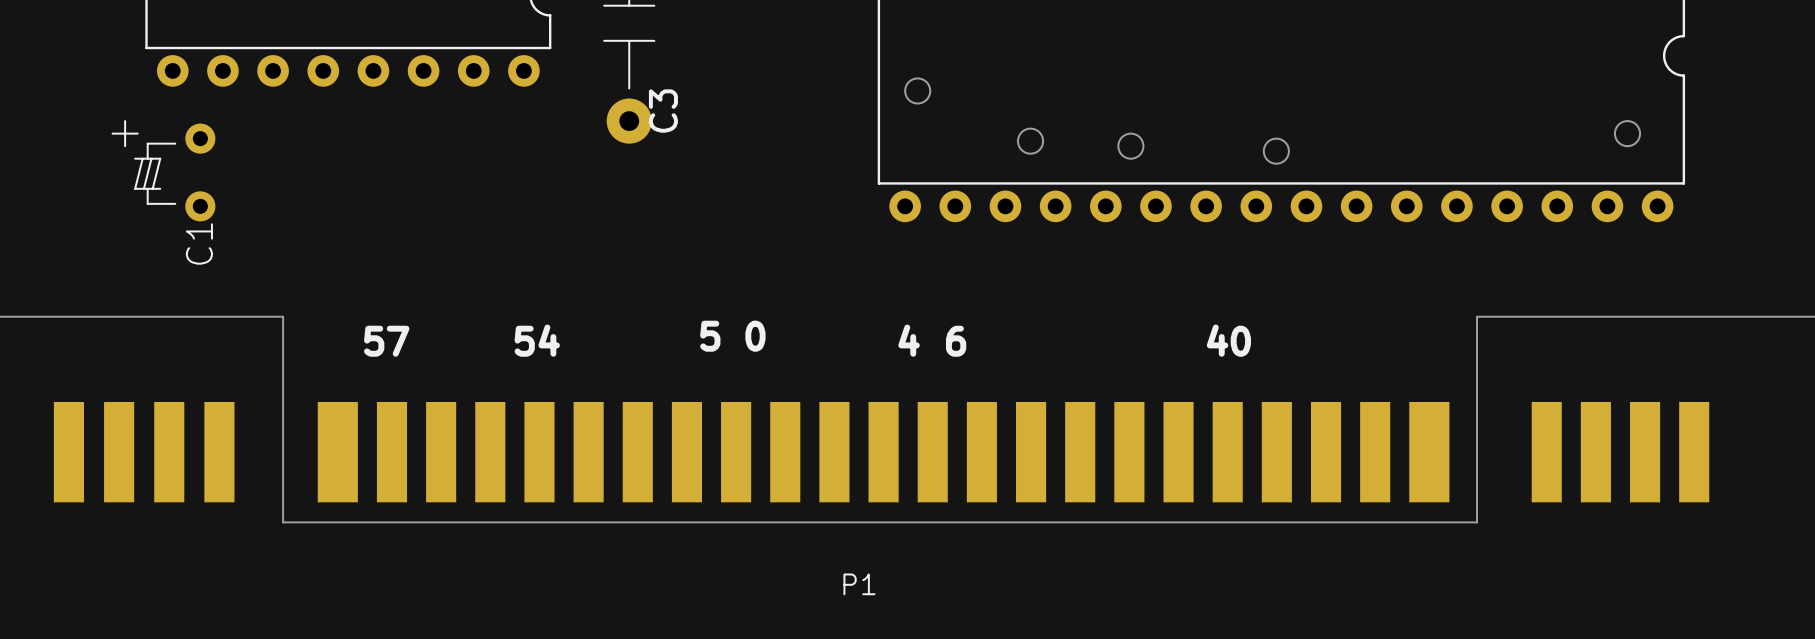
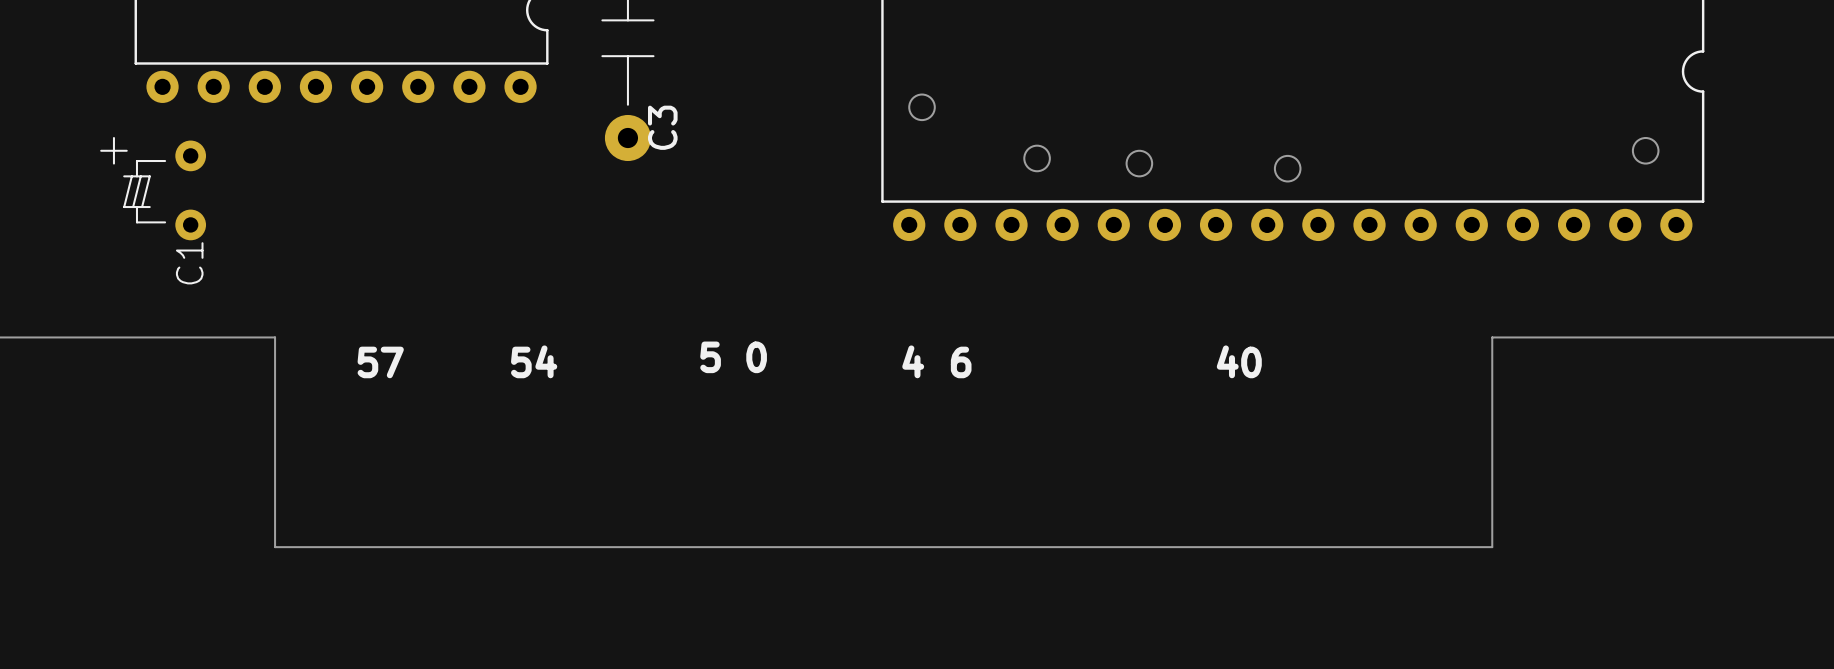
P1: (881, 452) -> none

